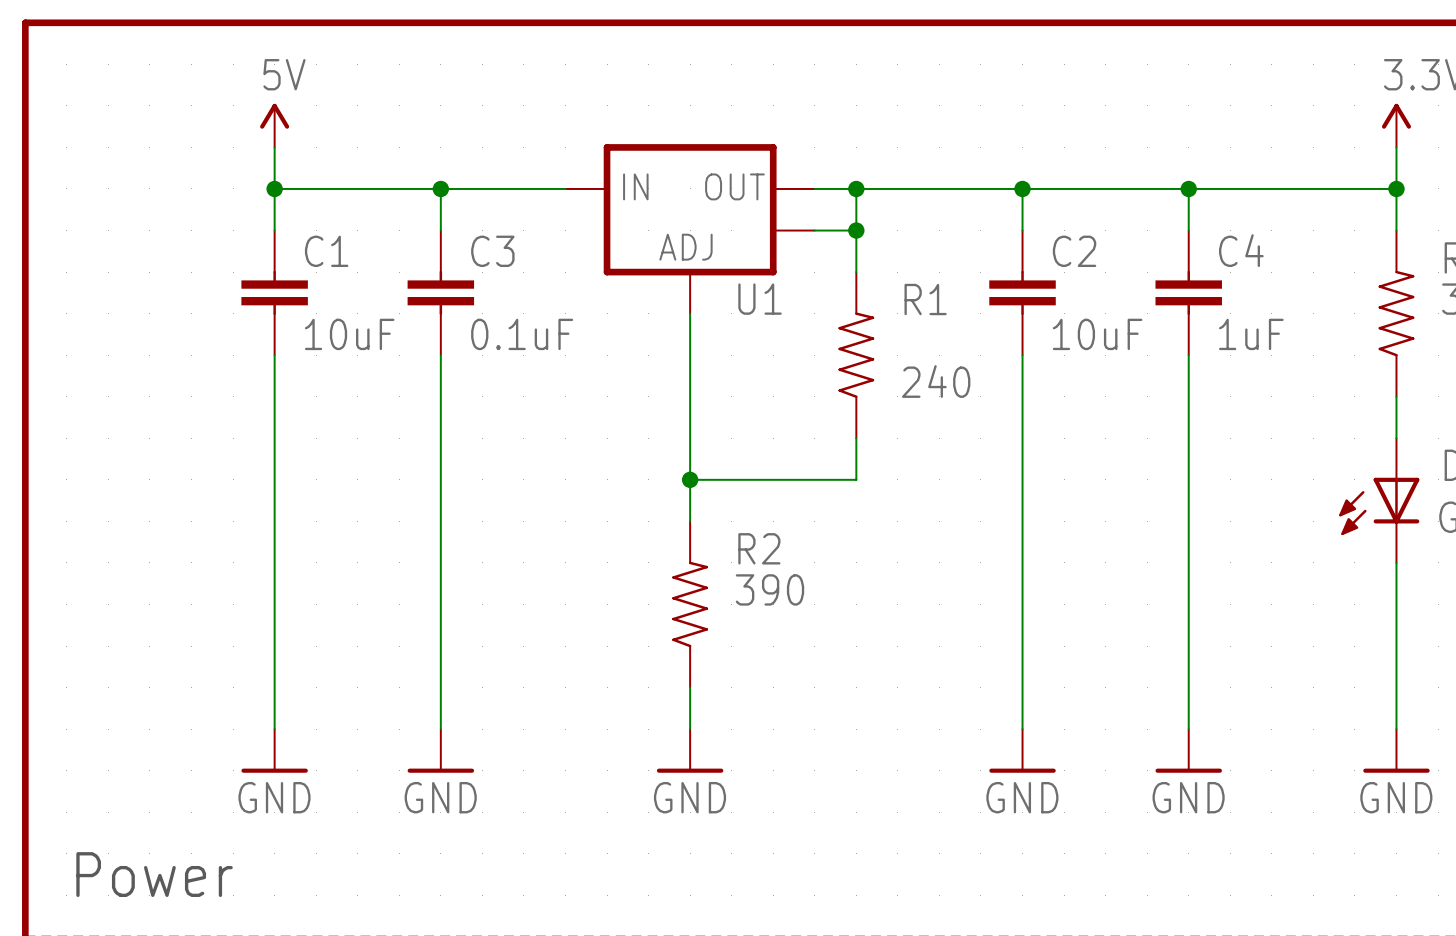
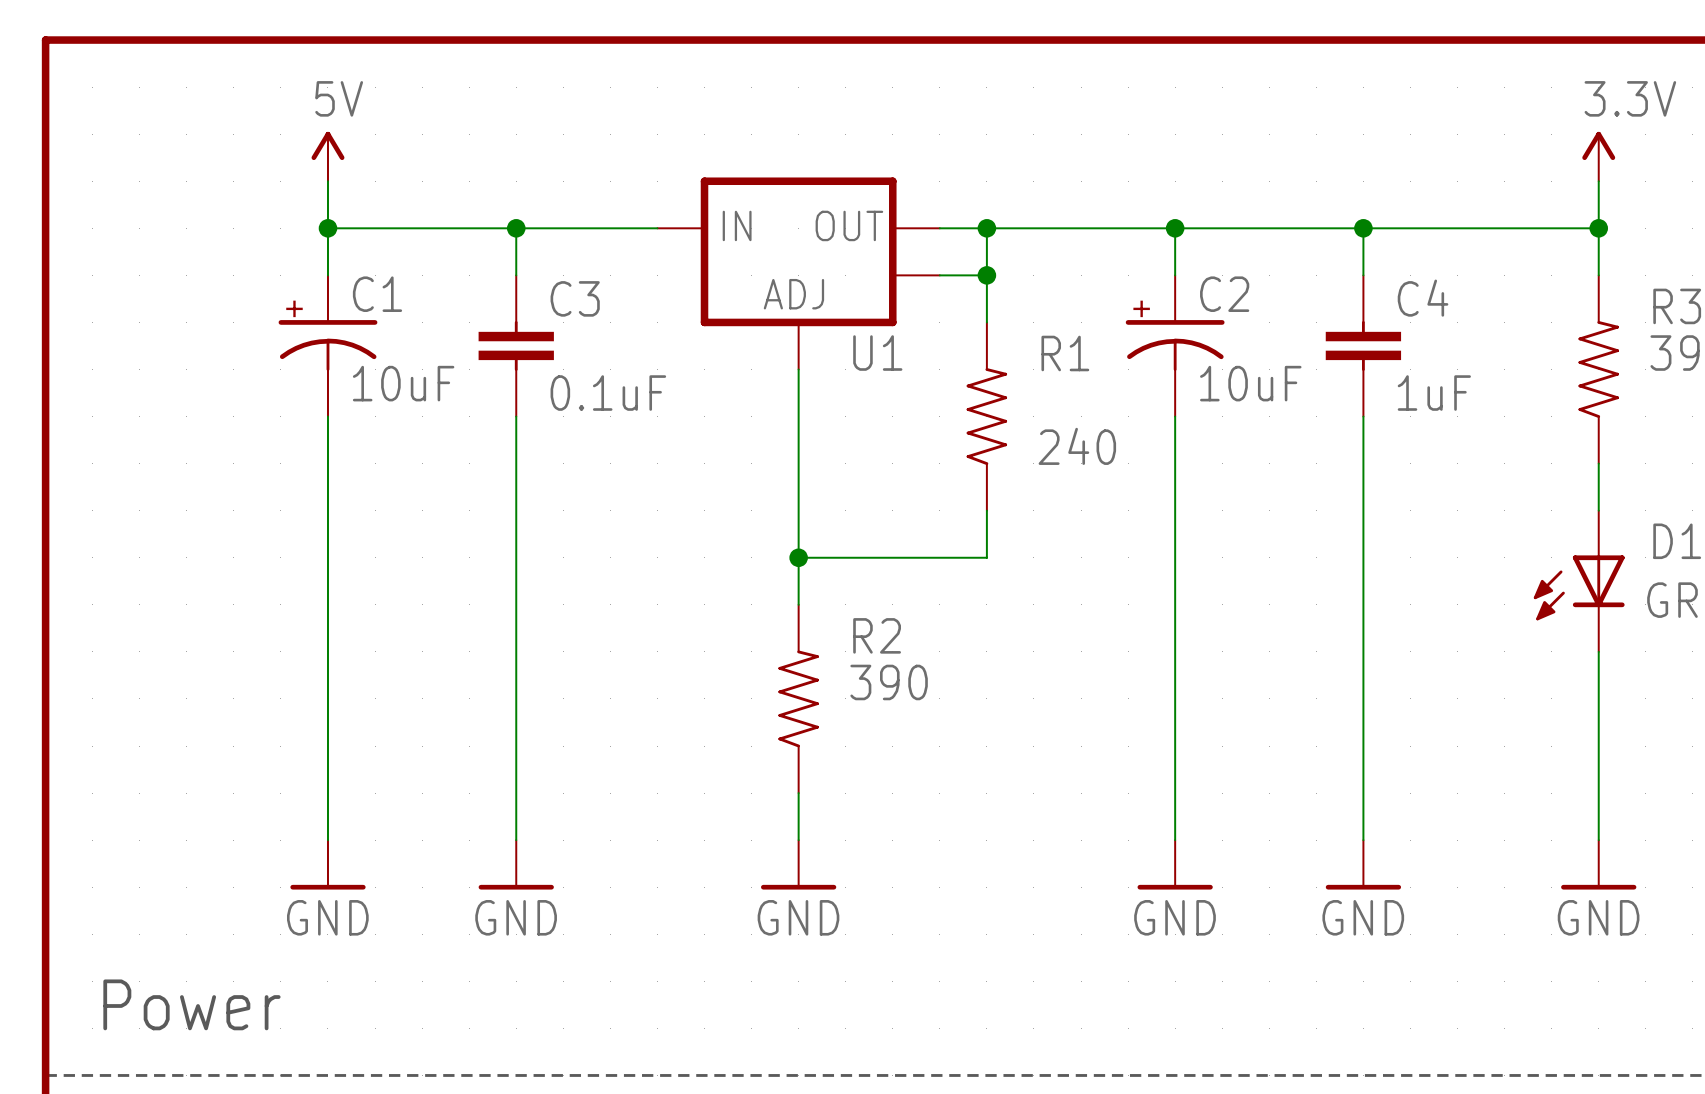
C1 symbol: [241, 230, 308, 356] -> [278, 275, 378, 417]
C2 symbol: [989, 230, 1056, 356] -> [1125, 275, 1225, 417]

